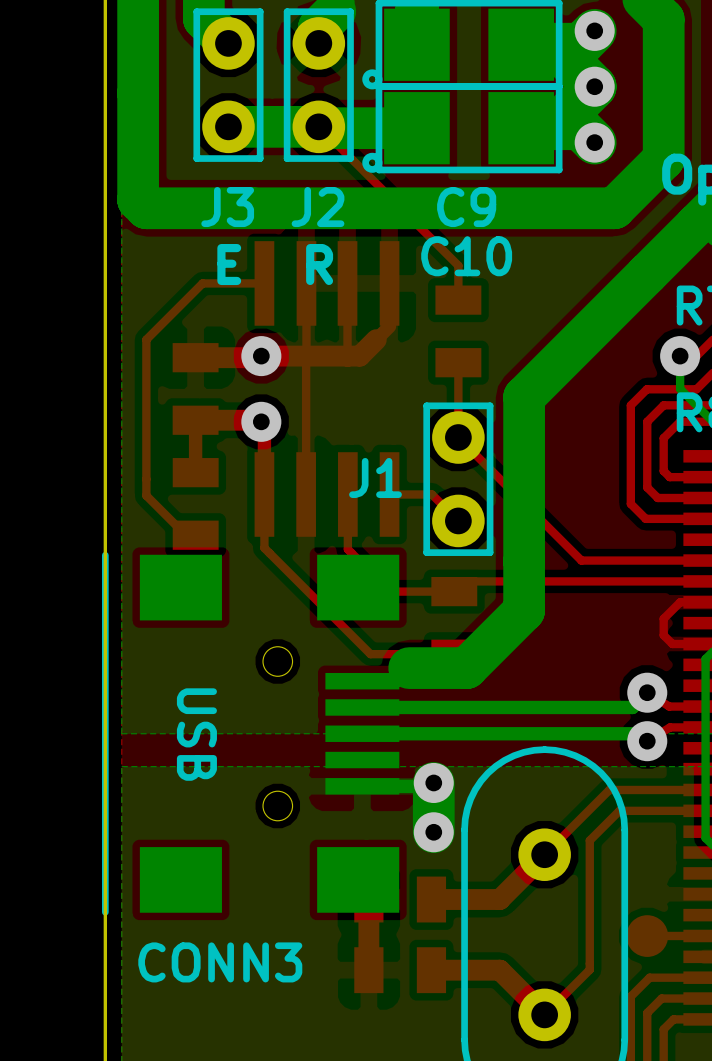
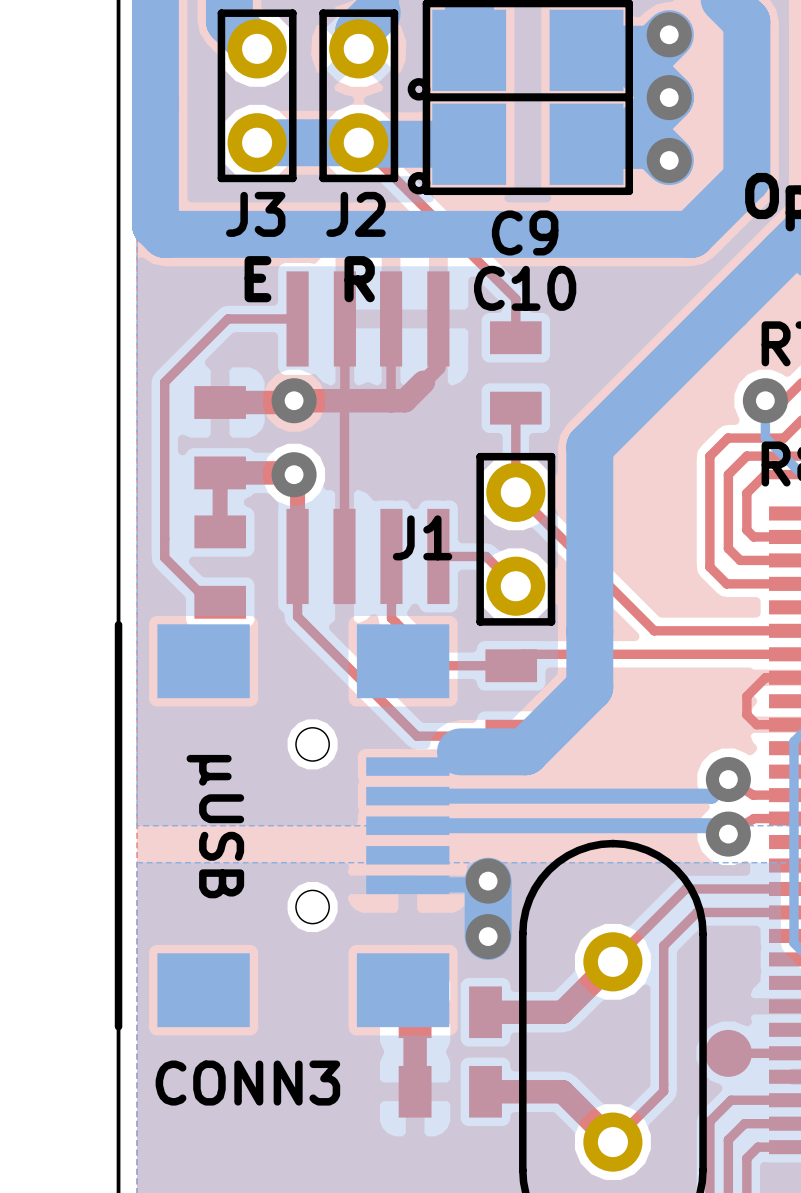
J3 name position: J3 (227, 207) -> J3 (255, 214)
J2 name position: J2 (318, 207) -> J2 (356, 214)
text position: E (229, 264) -> E (257, 279)
text position: R (319, 264) -> R (359, 279)
CONN3 value: USB (196, 734) -> μUSB (215, 826)

